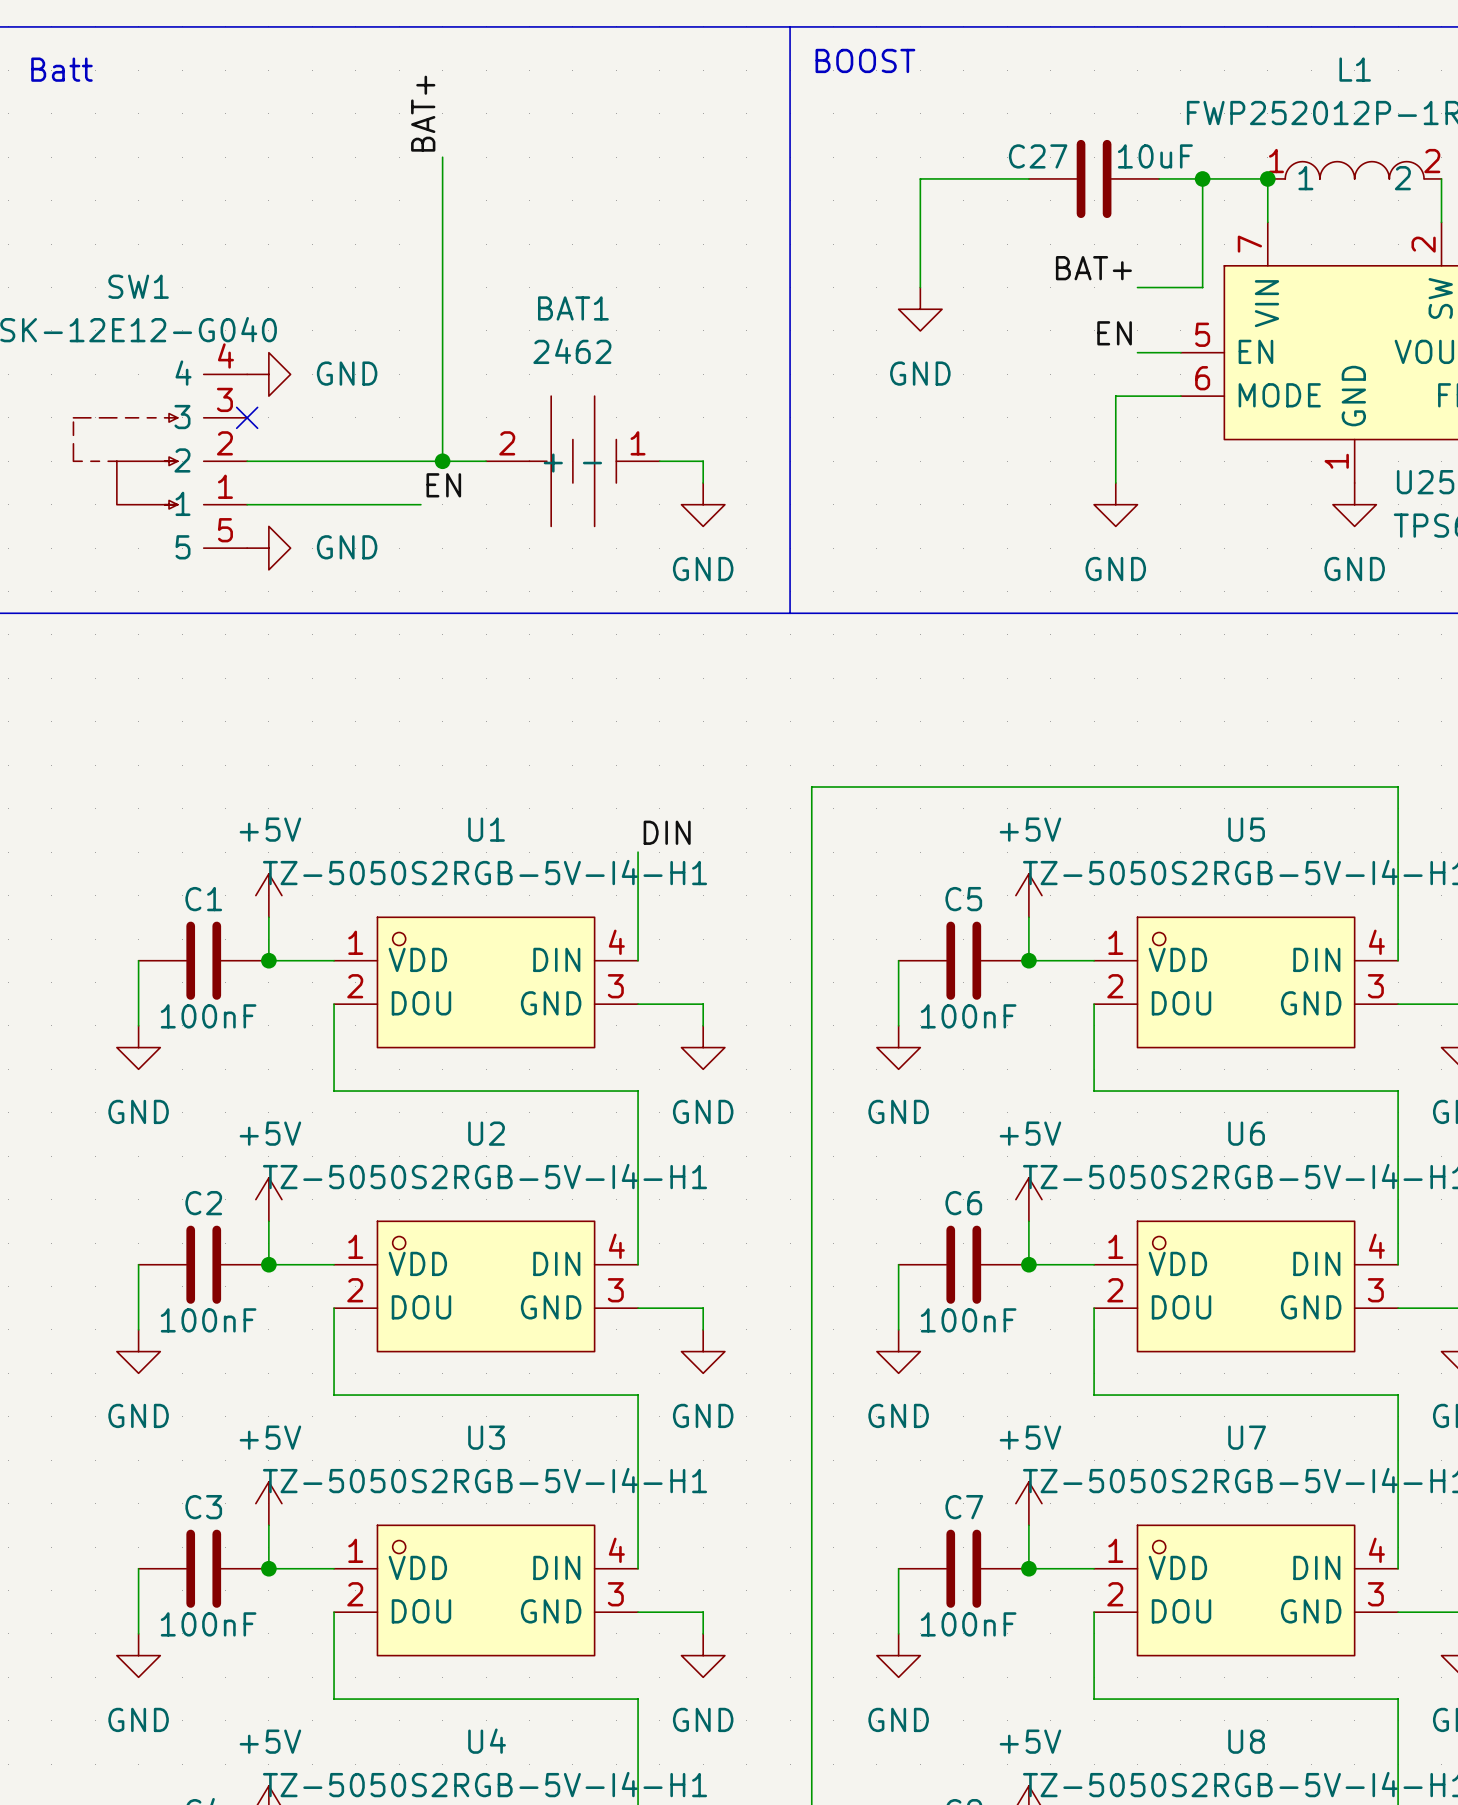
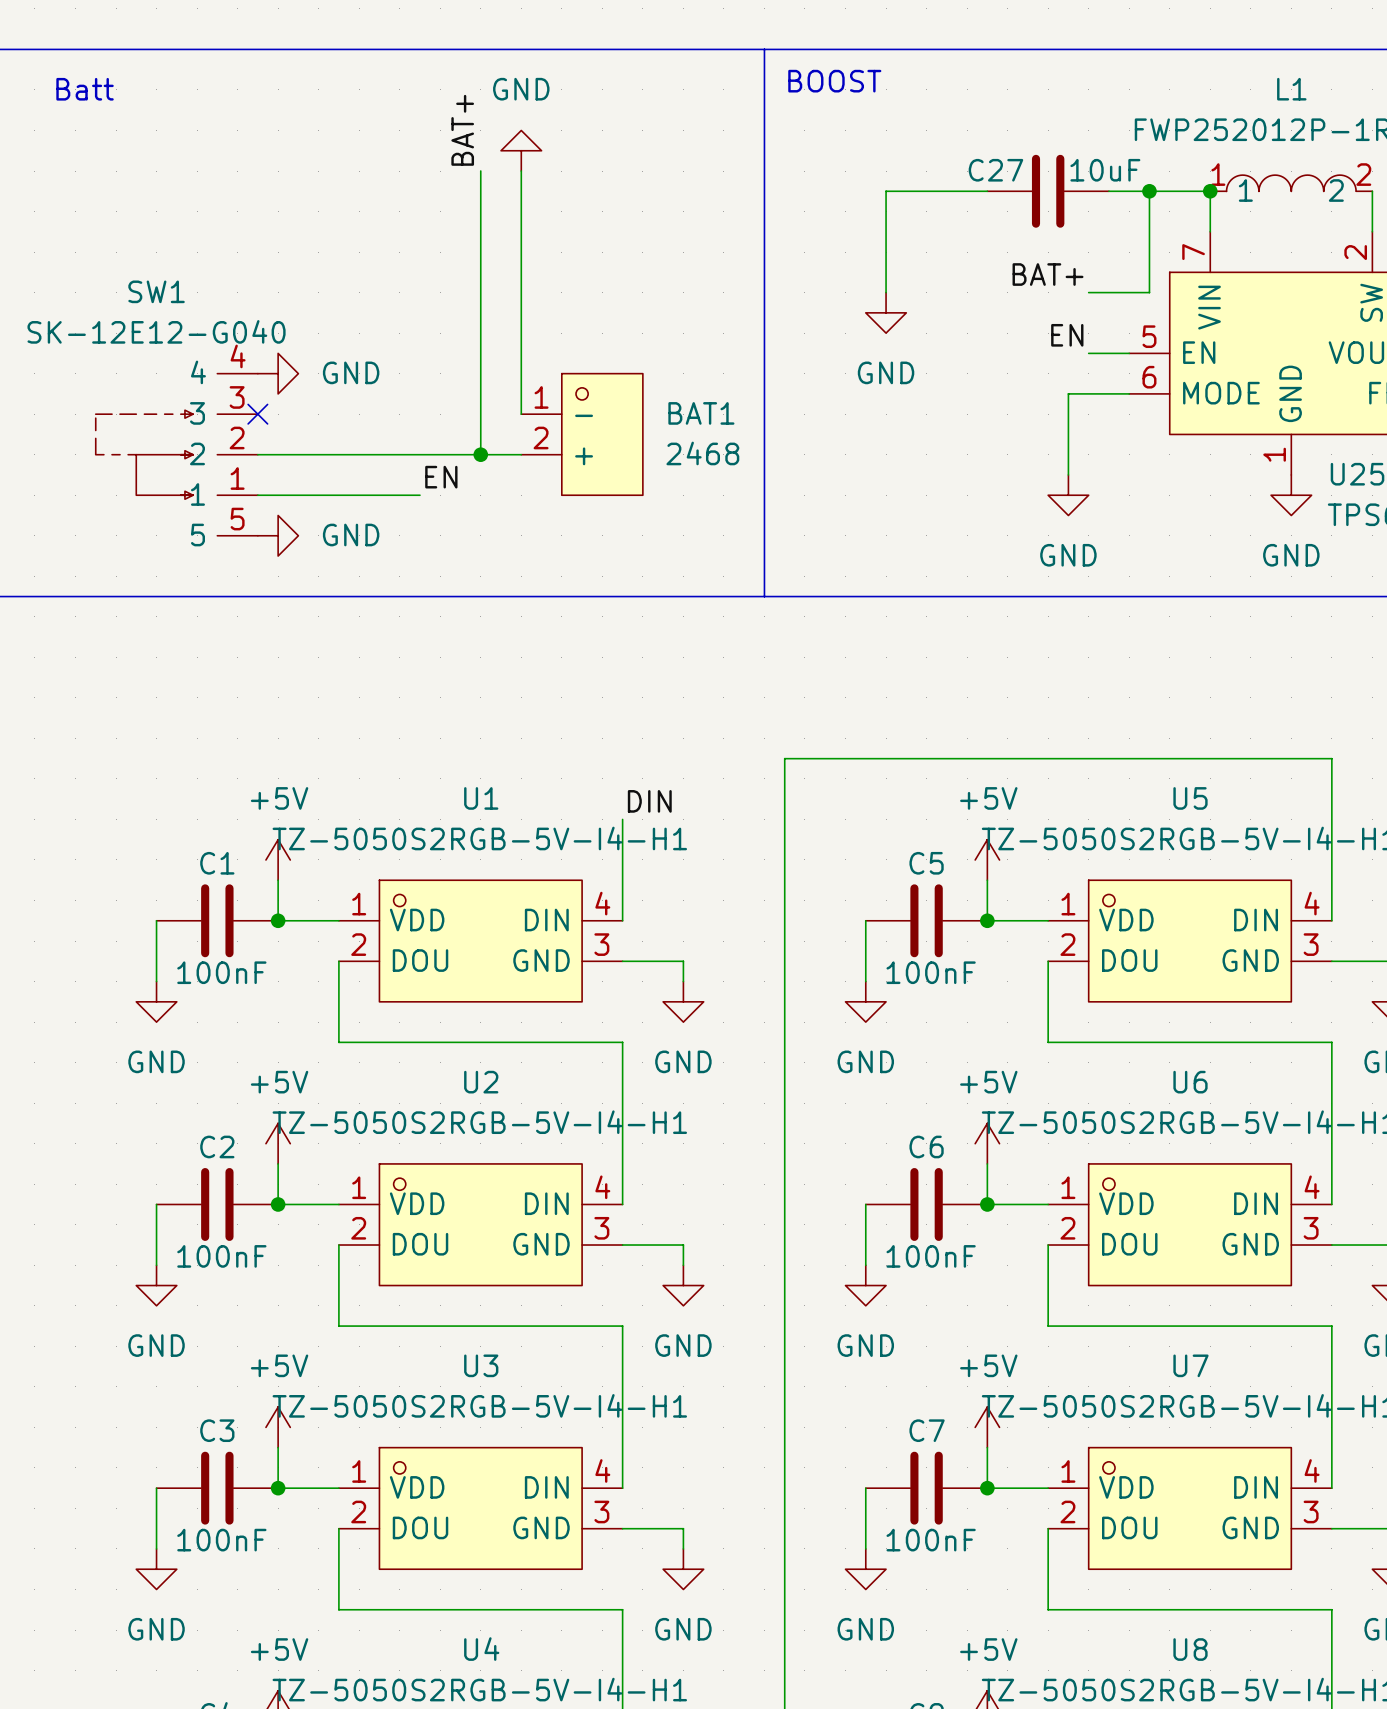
label position: BAT+ (423, 113) -> BAT+ (462, 130)
wire: (442, 157) (442, 461) -> none
wire: none -> (480, 171) (480, 454) (521, 454)
wire: none -> (521, 171) (521, 414)
BAT1 name position: BAT1 (573, 308) -> BAT1 (701, 413)
BAT1 value: 2462 (572, 351) -> 2468 (702, 453)
BAT1 symbol: [486, 396, 660, 527] -> [521, 373, 643, 496]
junction position: (442, 461) -> (480, 454)
wire: (659, 461) (703, 461) (703, 482) -> none
power symbol rotation: 0° (703, 504) -> 180° (521, 150)
power symbol position: GND (703, 504) -> GND (521, 150)

